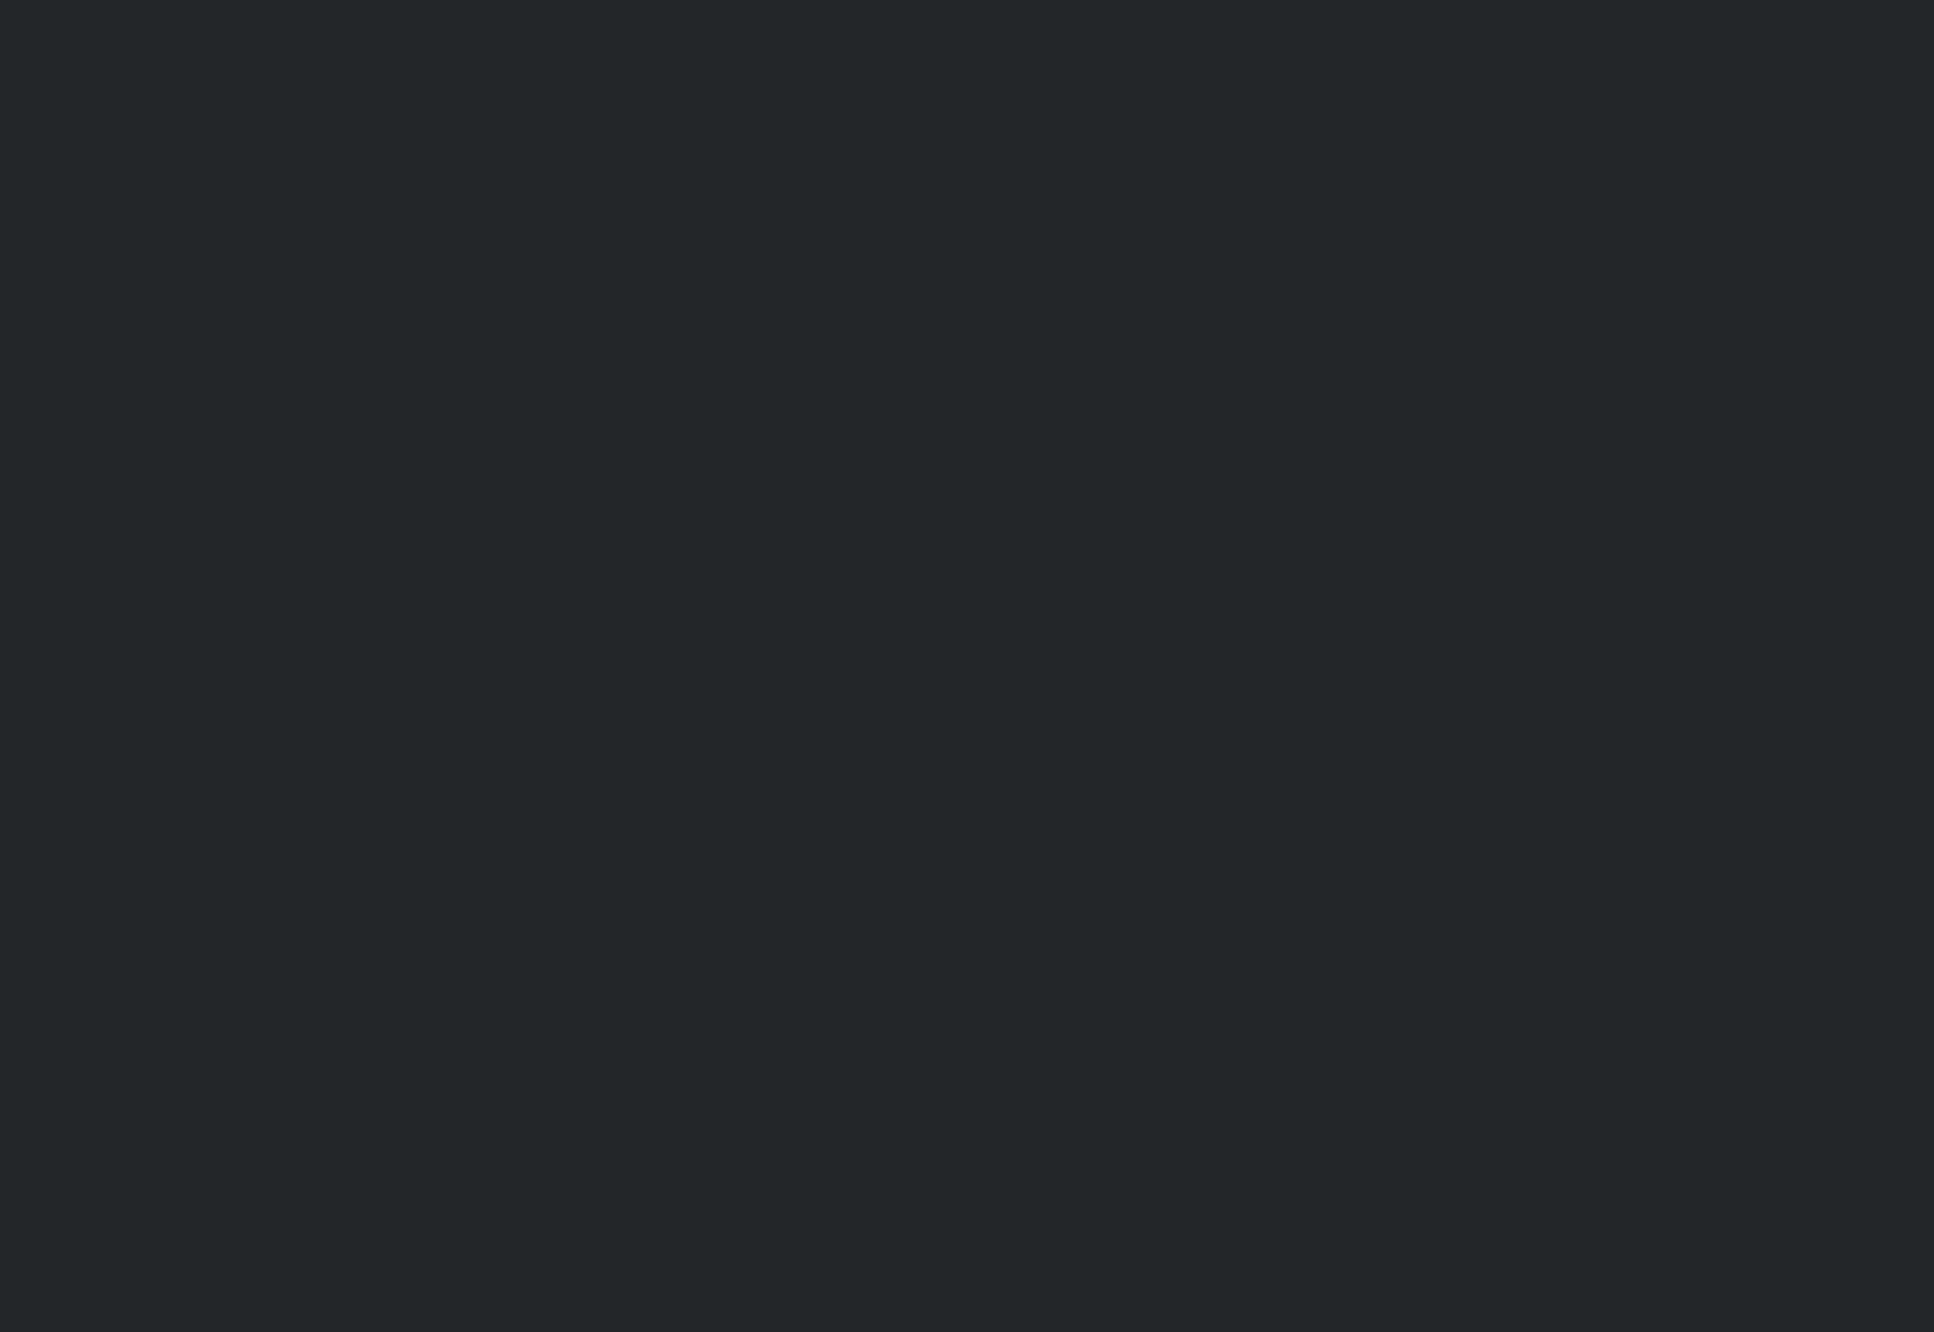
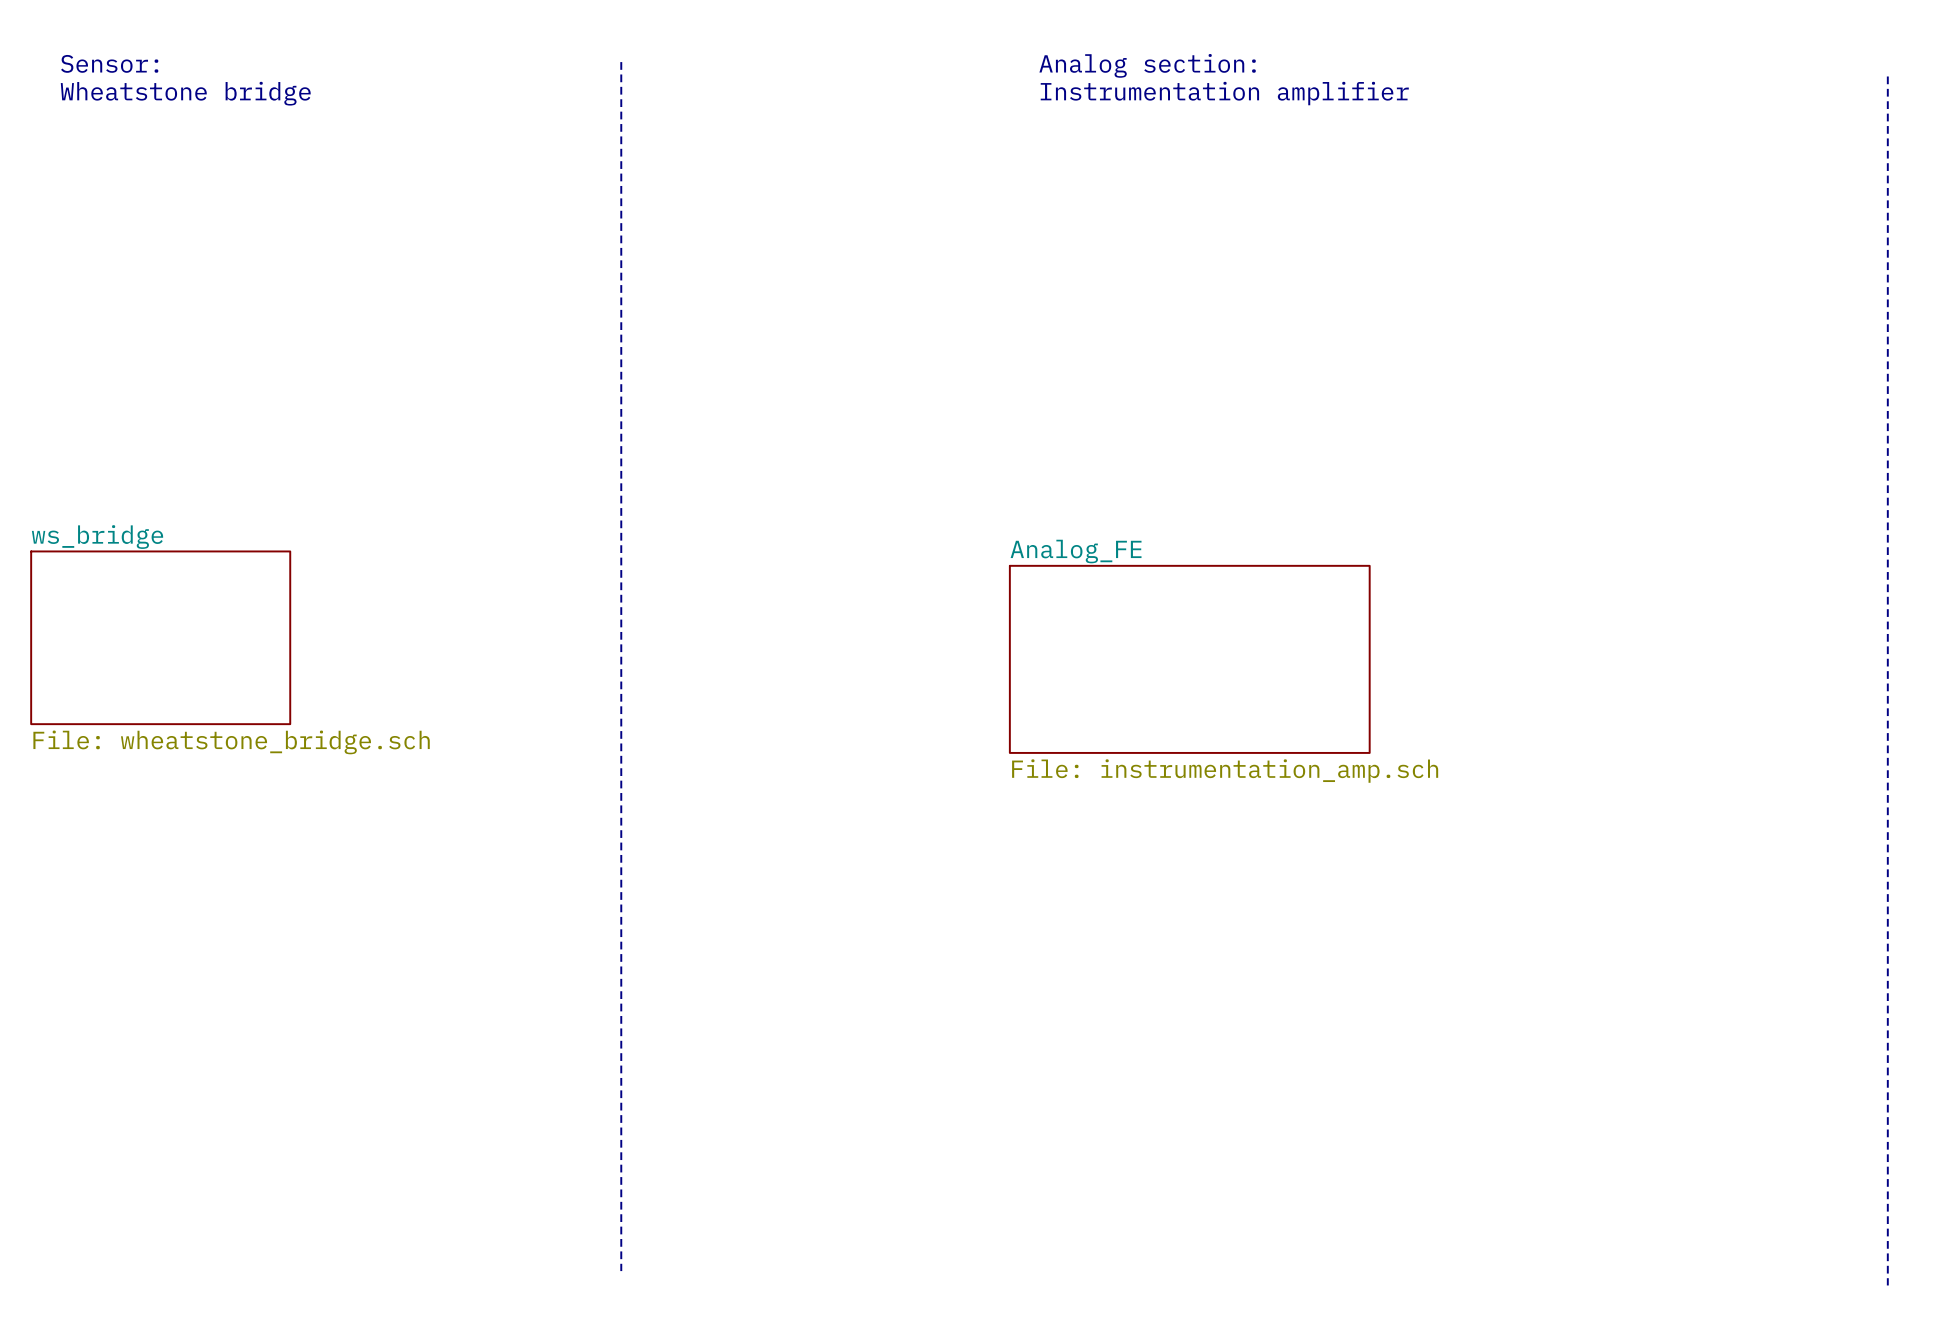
line: none -> (621, 62) (621, 1271)
text: none -> Sensor: (109, 63)
text: none -> Analog section: (1147, 65)
line: none -> (1887, 76) (1887, 1285)
text: none -> Wheatstone bridge (185, 93)
text: none -> Instrumentation amplifier (1224, 93)
sheet ws_bridge: none -> File: wheatstone_bridge.sch (160, 637)
sheet Analog_FE: none -> File: instrumentation_amp.sch (1189, 659)

